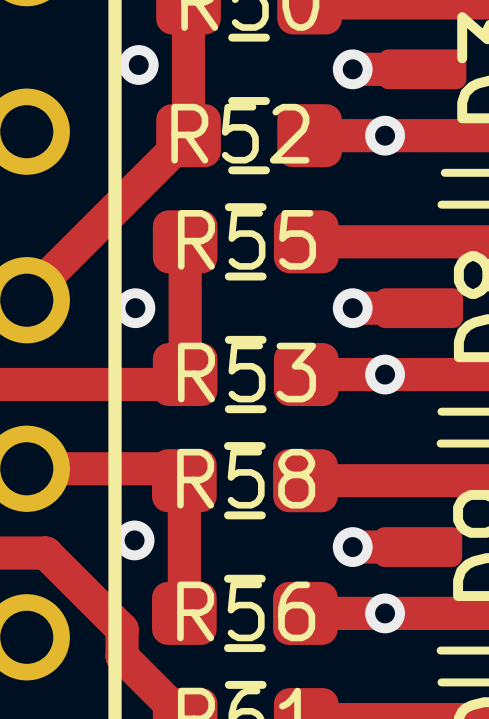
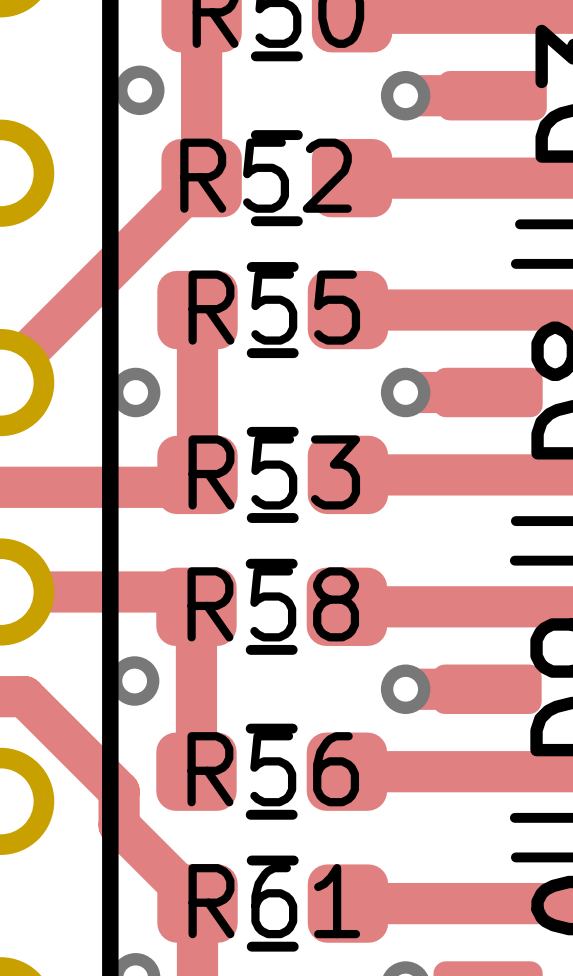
via: (385, 135) -> none
via: (385, 374) -> none
via: (385, 613) -> none

